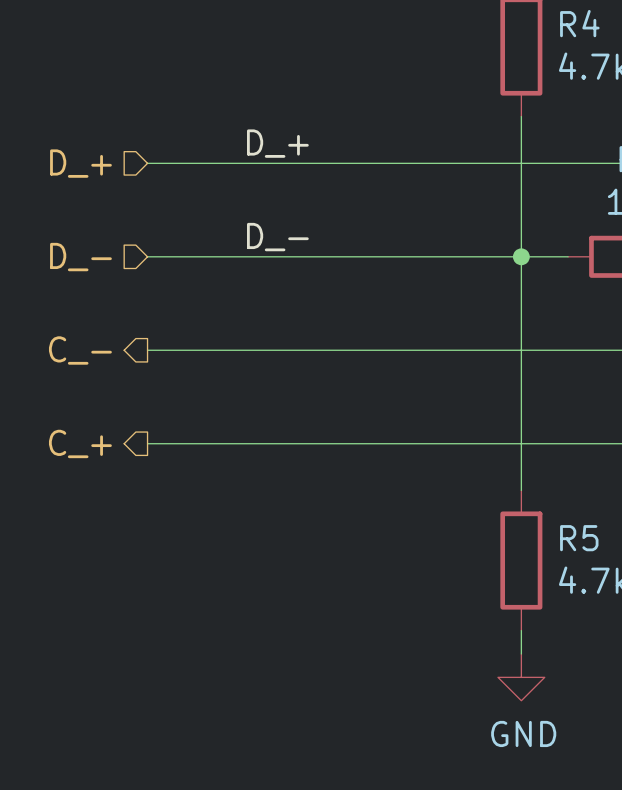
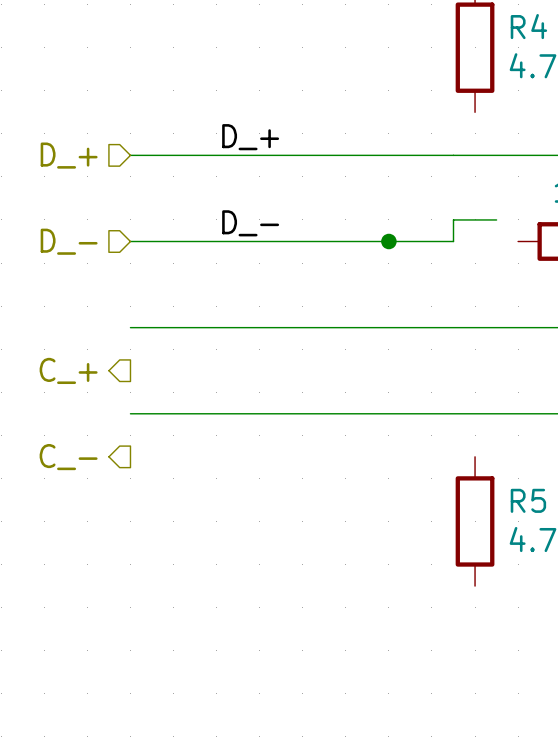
wire: (521, 116) (521, 490) -> none
wire: (498, 256) (568, 256) -> (453, 241) (453, 219) (496, 219)
junction position: (521, 256) -> (388, 241)
hierarchical label position: C_- (80, 350) -> C_- (68, 457)
hierarchical label position: C_+ (80, 443) -> C_+ (68, 370)
wire: (521, 630) (521, 654) -> none
power symbol: GND (521, 677) -> none

